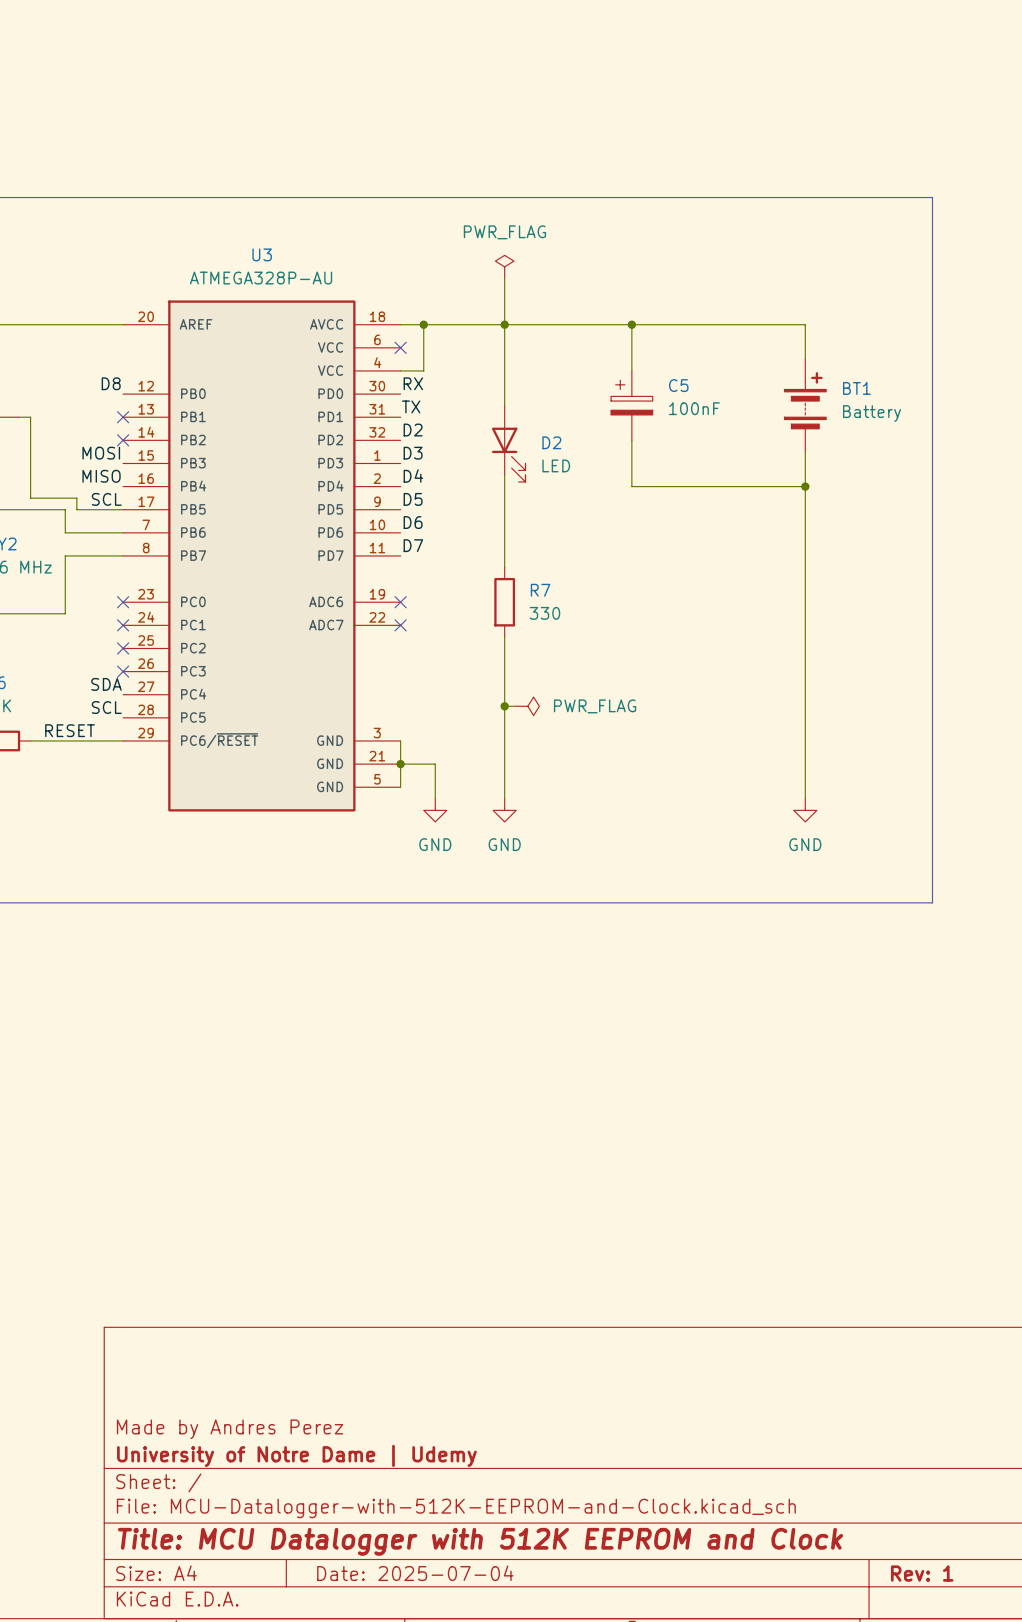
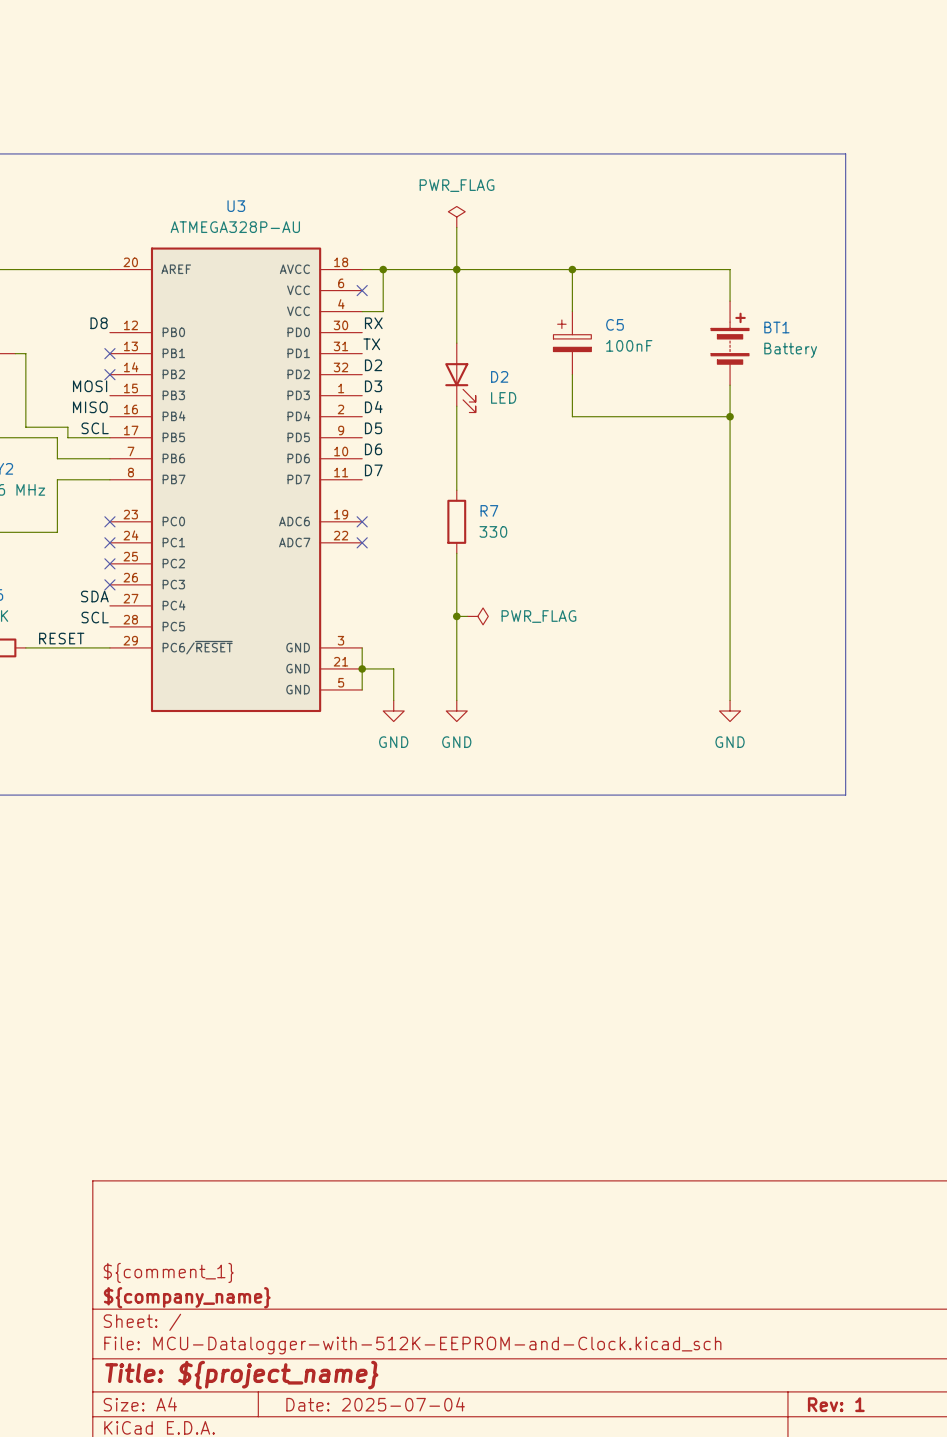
title block: Made by Andres Perez (230, 1429) -> ${comment_1} (168, 1272)
title block: University of Notre Dame | Udemy (296, 1455) -> ${company_name} (187, 1297)
title block: Title: MCU Datalogger with 512K EEPROM and Clock (480, 1541) -> Title: ${project_name} (241, 1375)

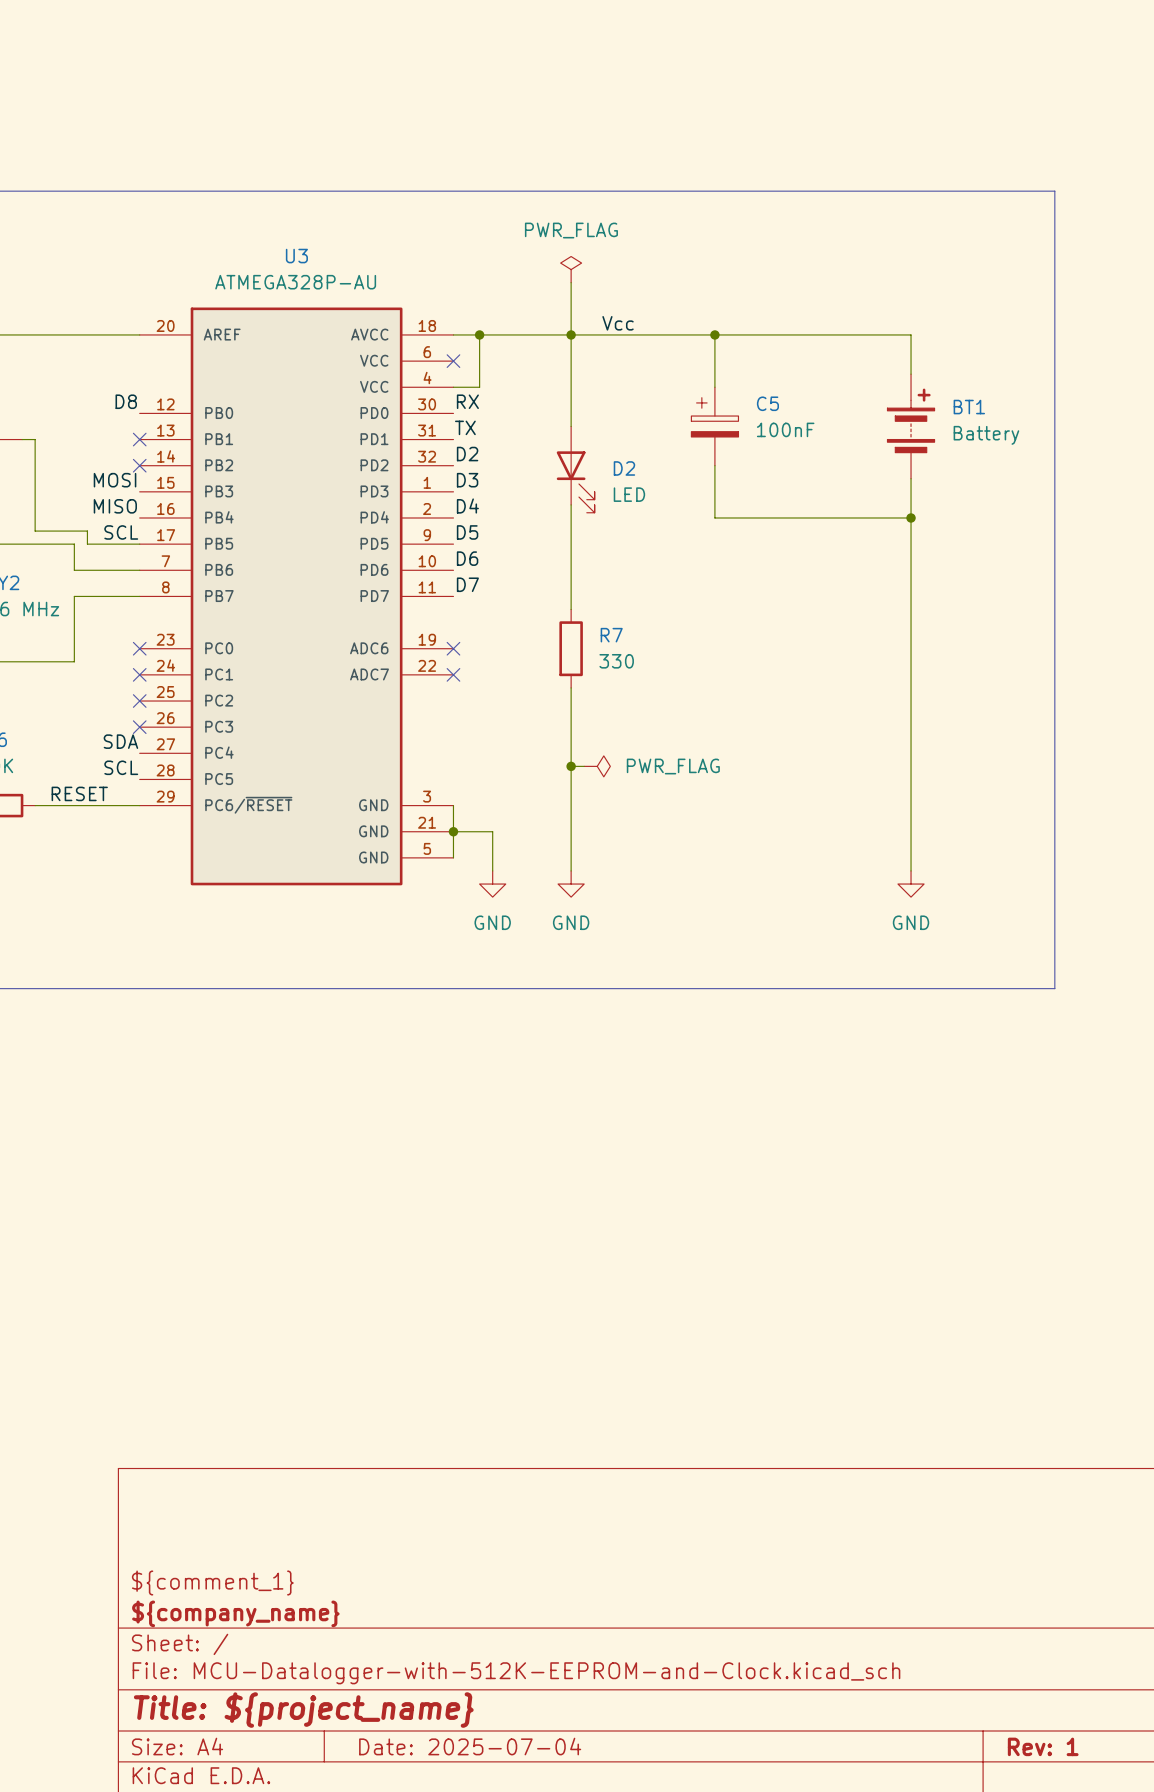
label: none -> Vcc (618, 323)

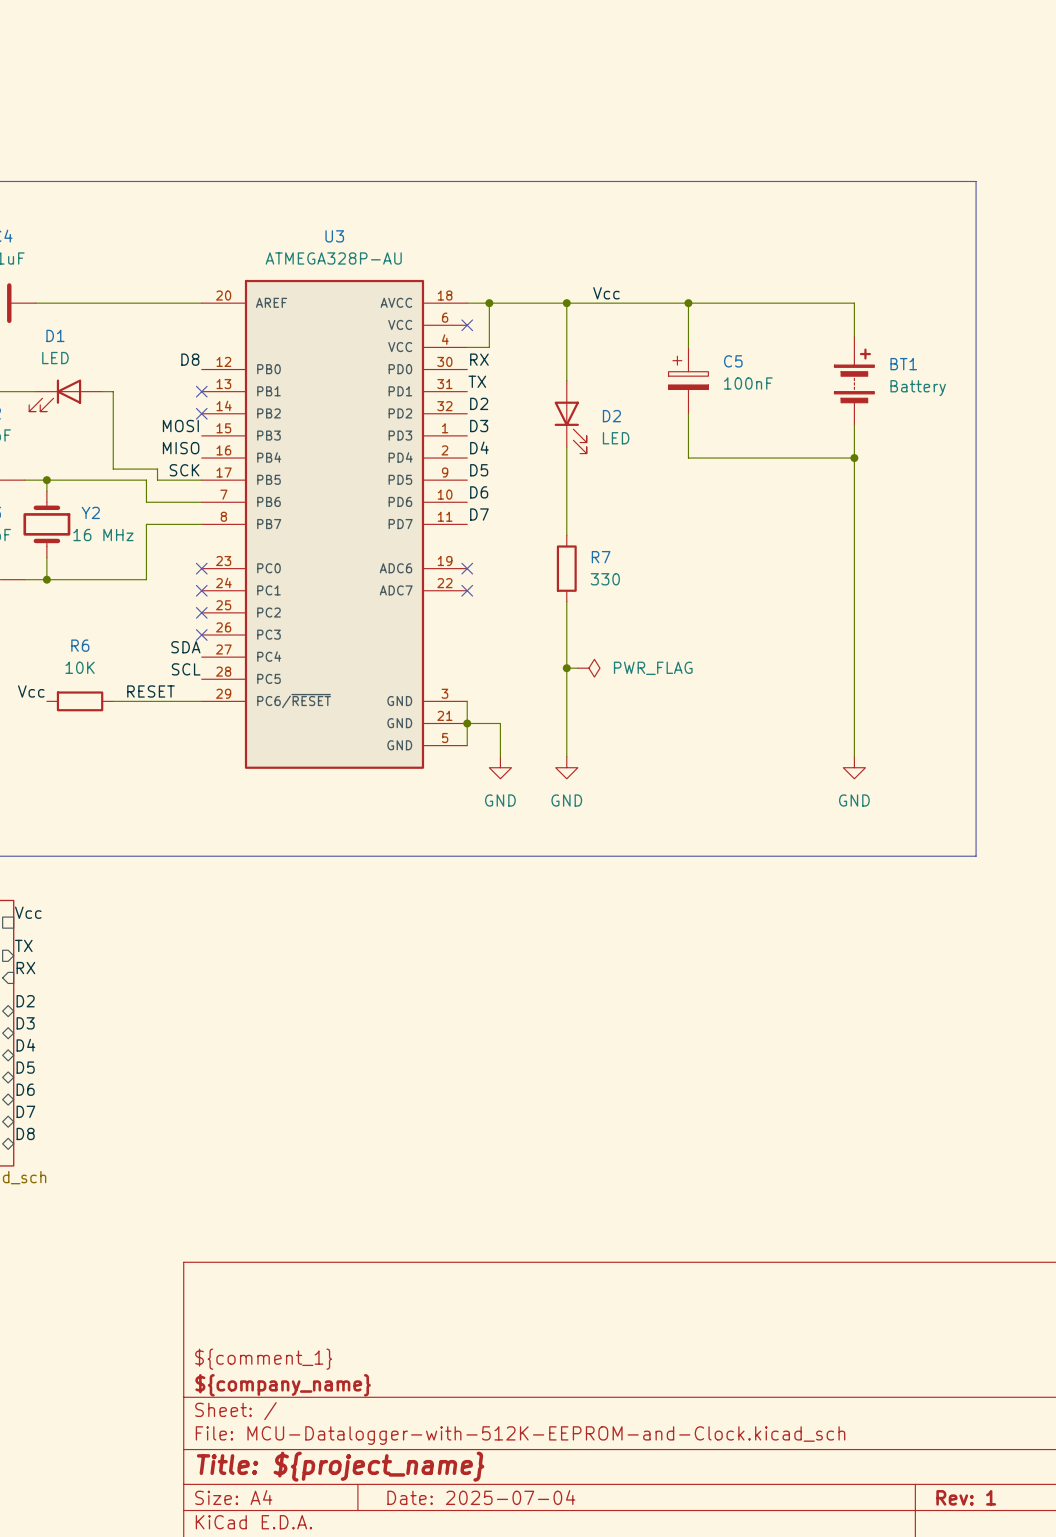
power symbol: PWR_FLAG (571, 269) -> none
wire: (571, 282) (571, 334) -> none
label: SCL (121, 532) -> SCK (184, 470)

